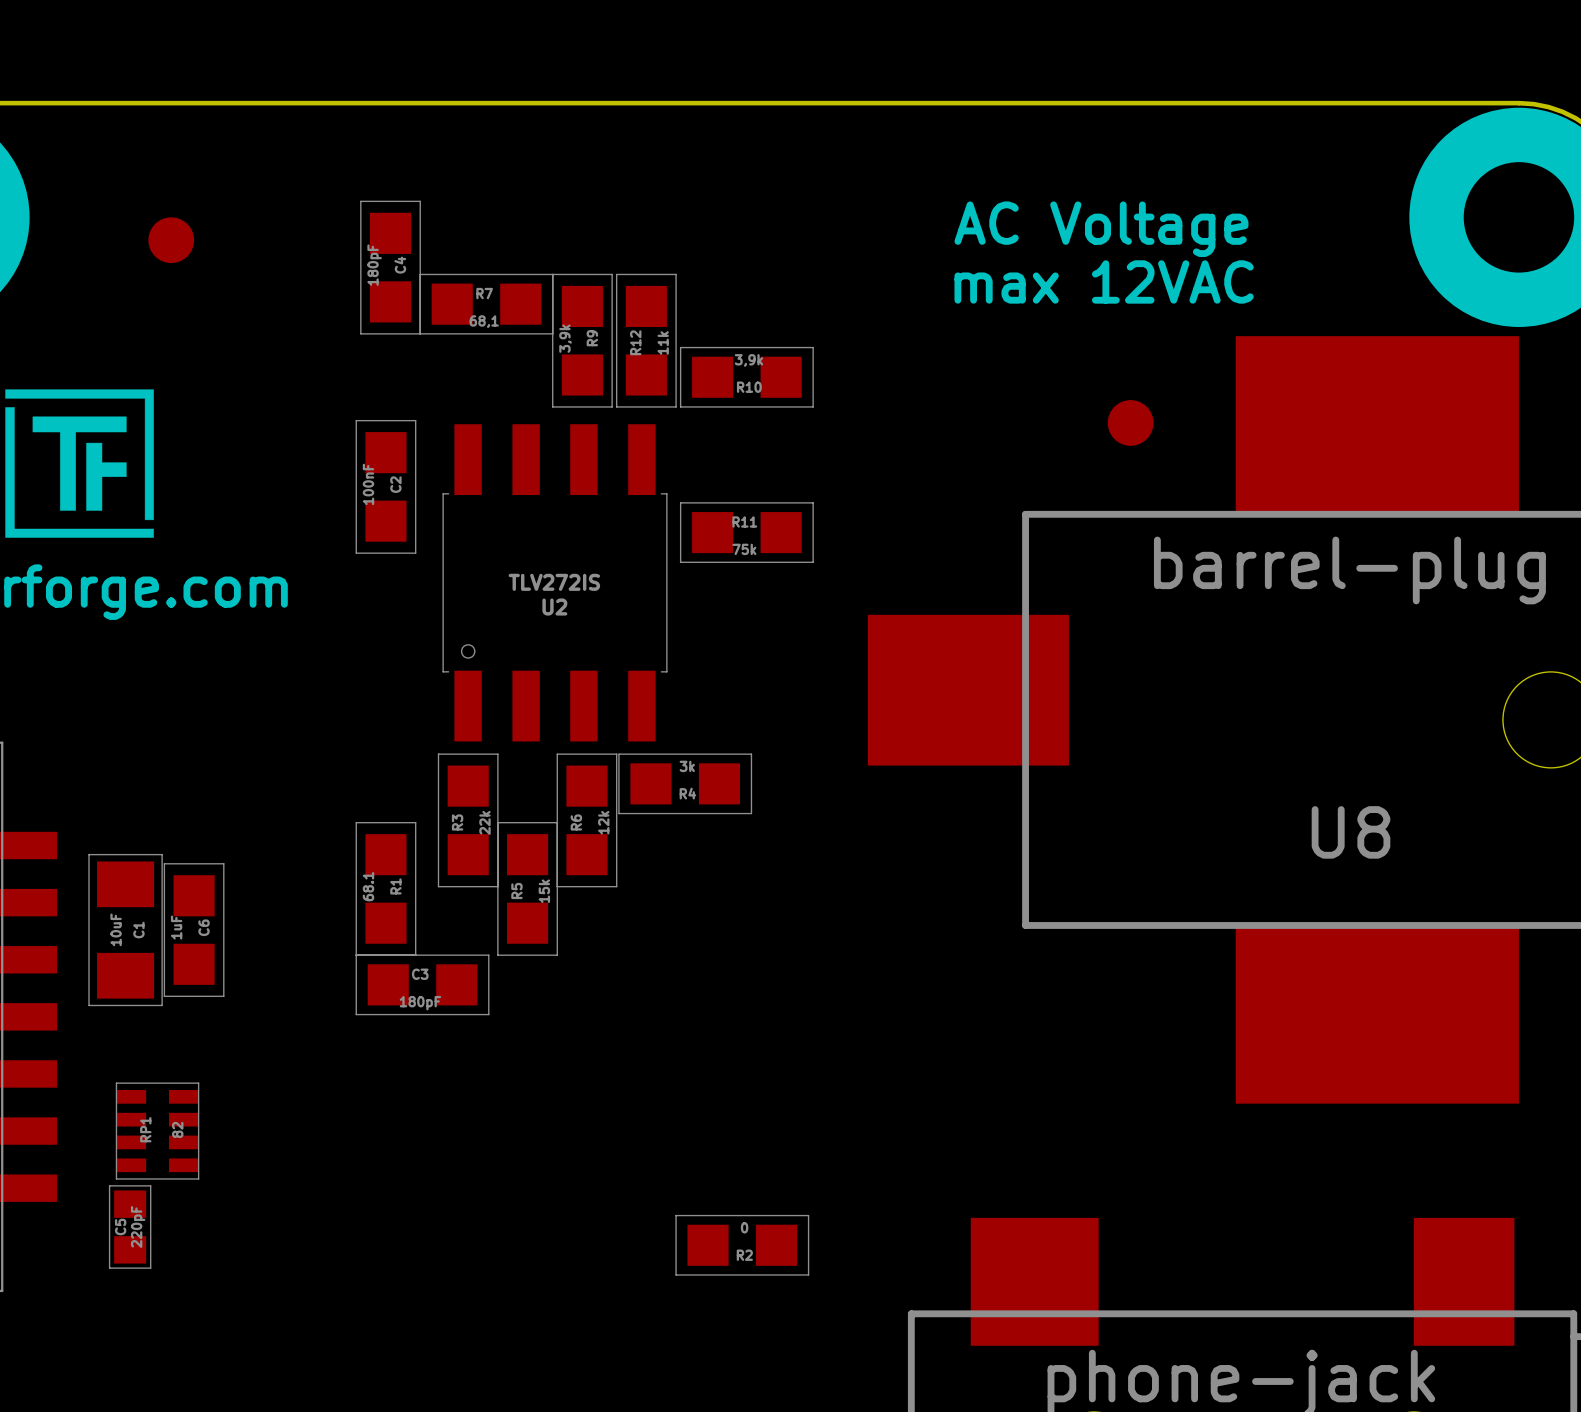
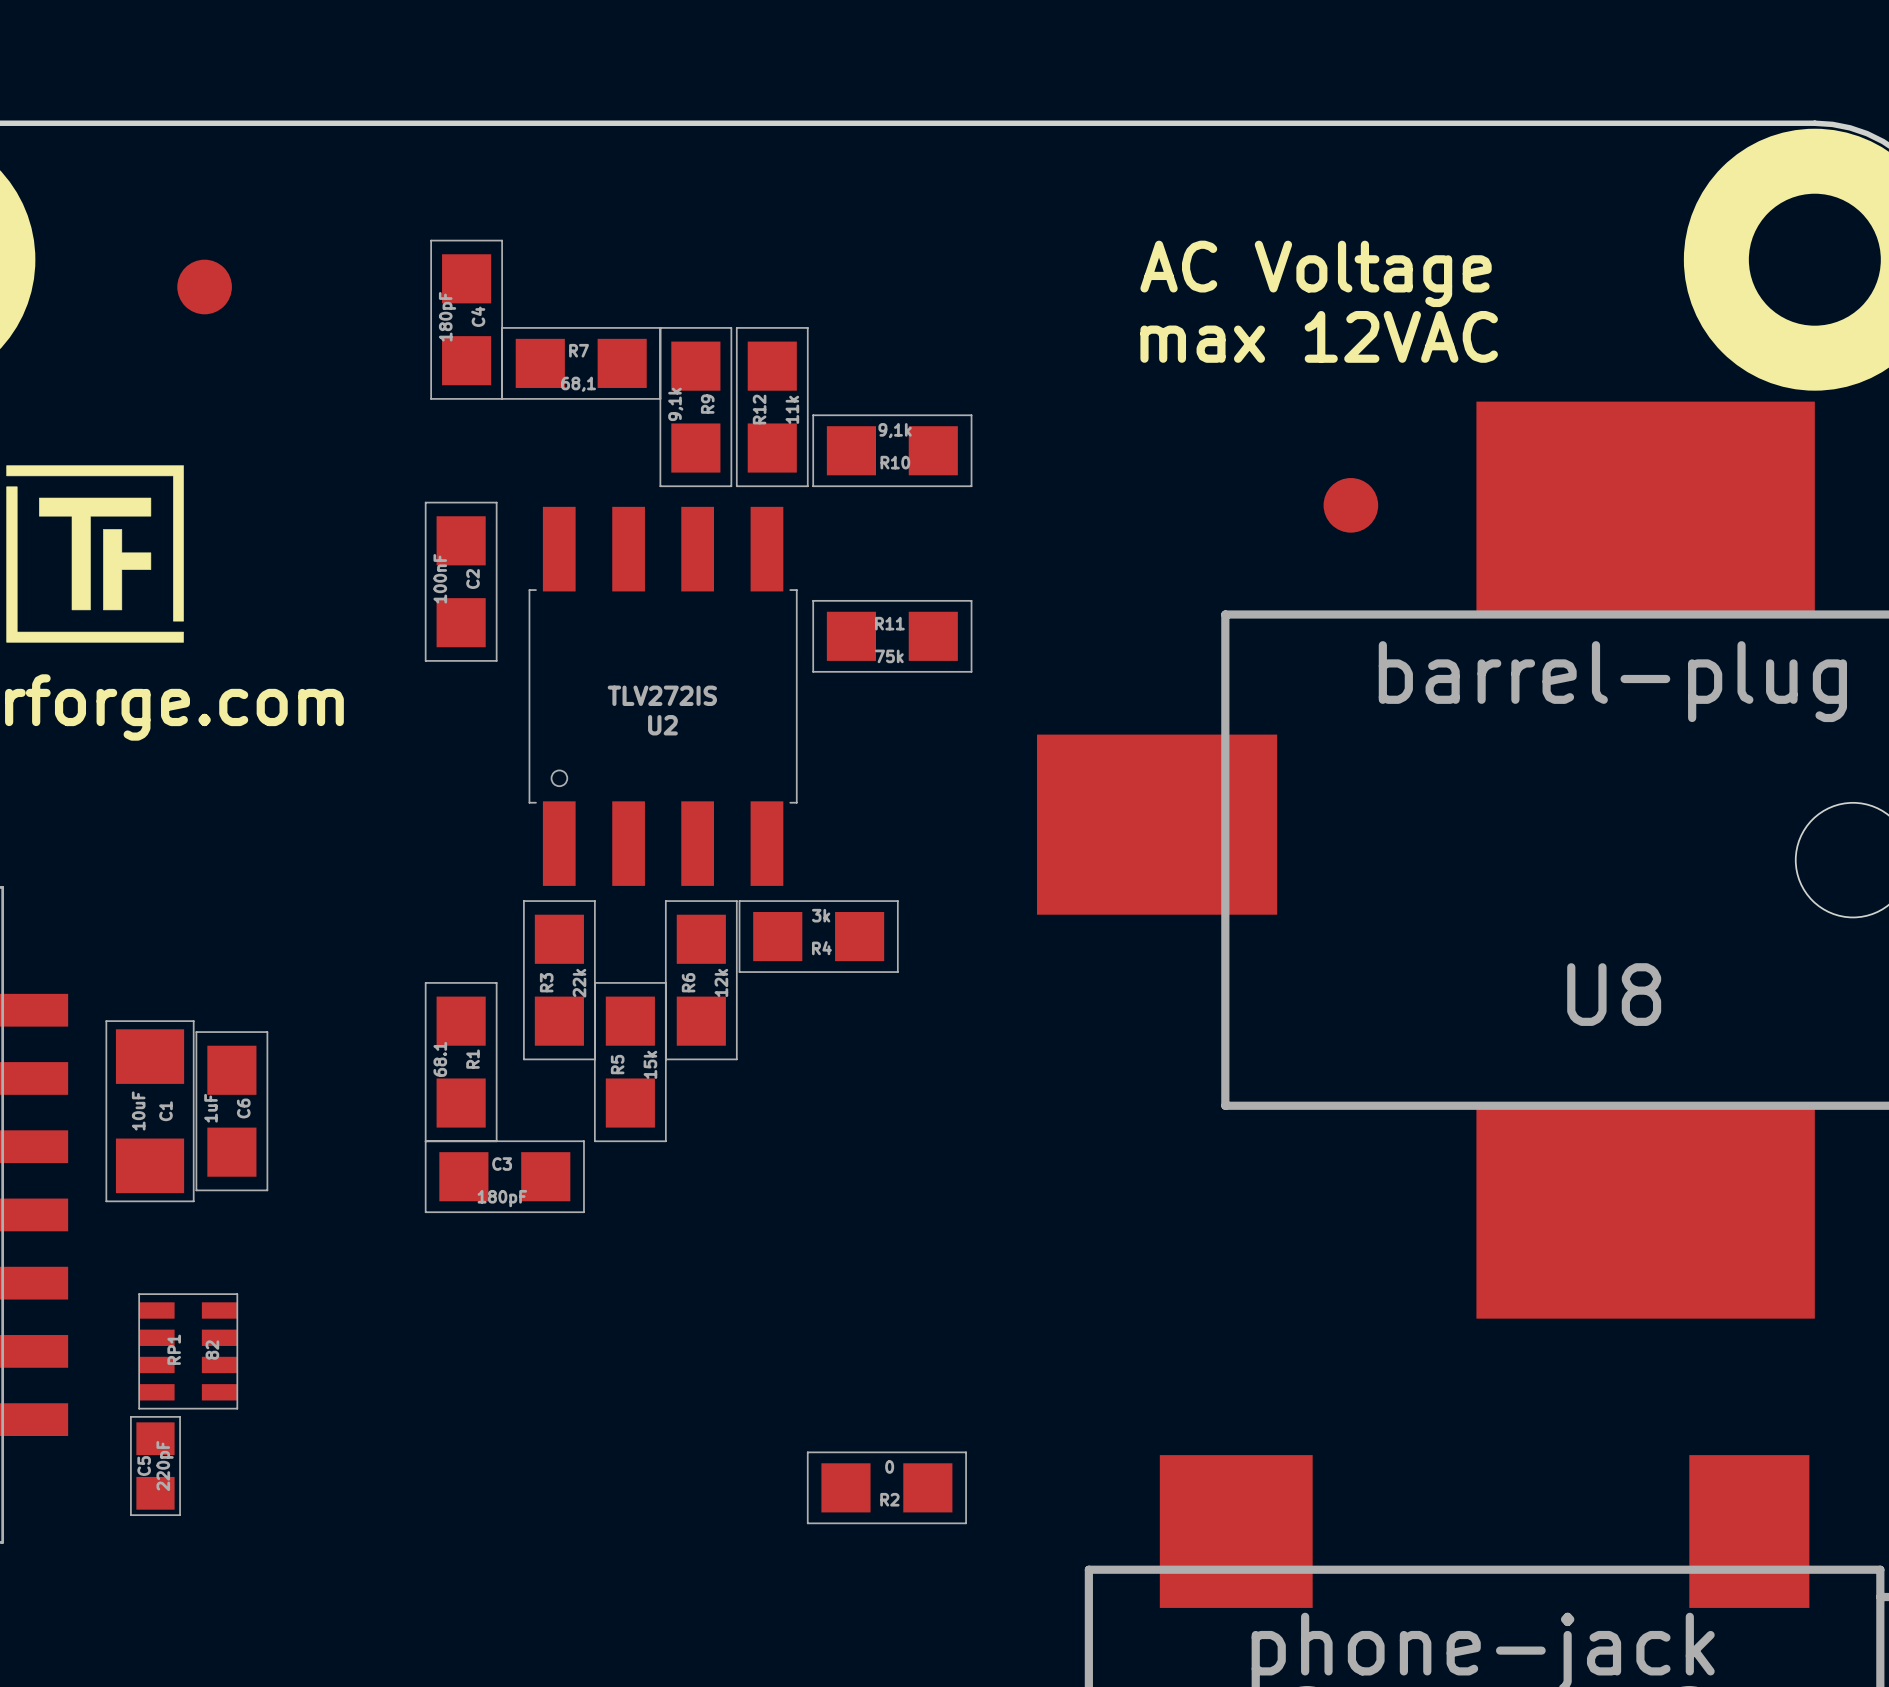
R9 value: 3,9k (565, 338) -> 9,1k (675, 404)
R10 value: 3,9k (748, 360) -> 9,1k (895, 430)

